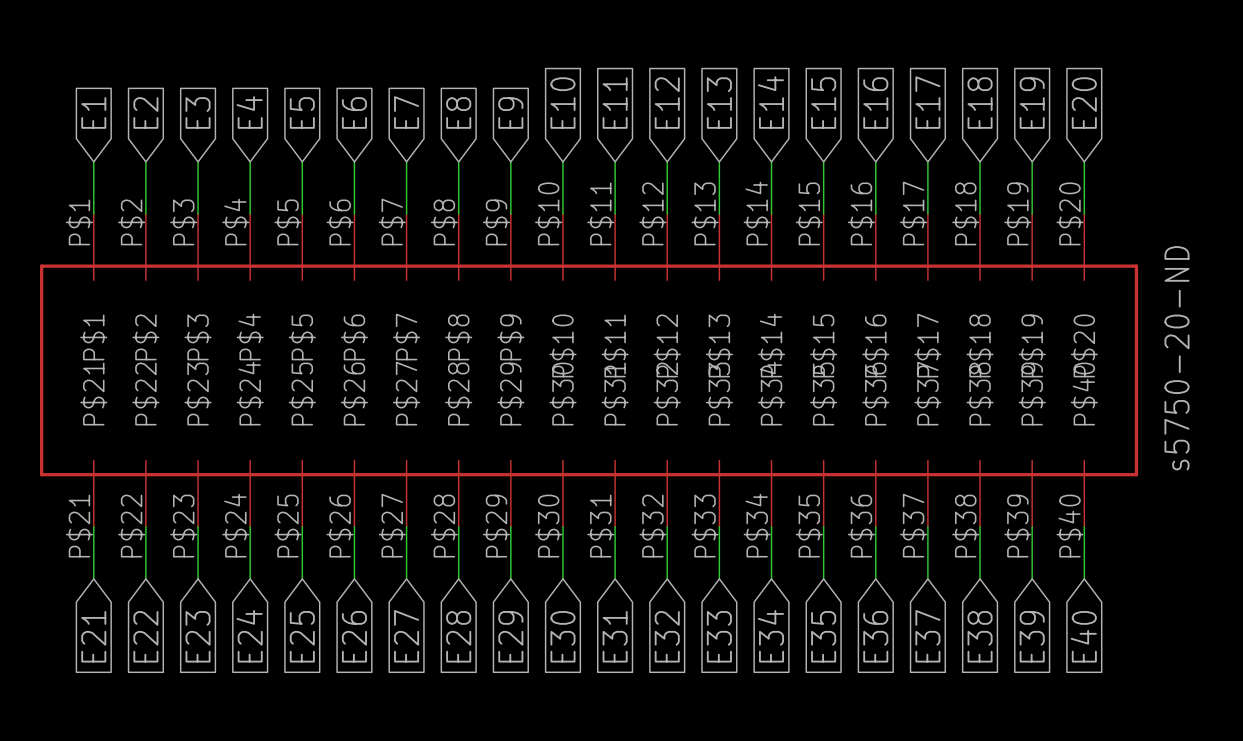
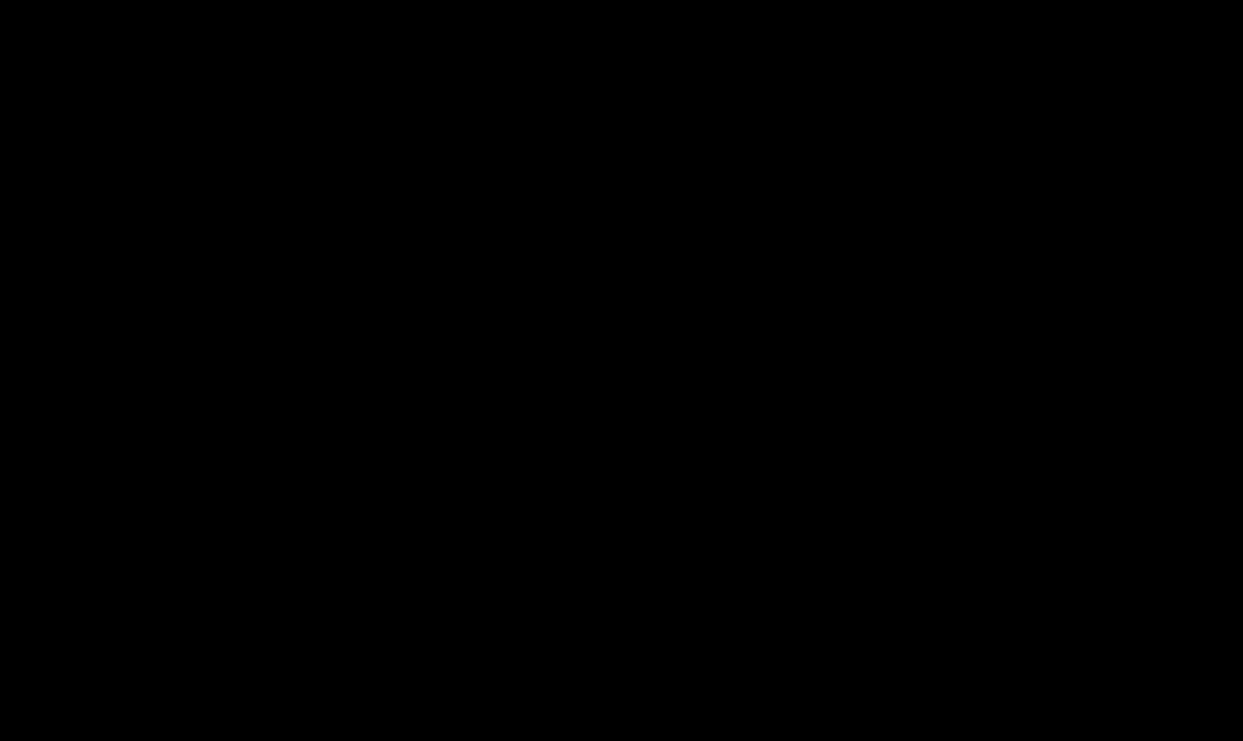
global label: E14 (770, 102) -> none
global label: E17 (927, 102) -> none
global label: E10 (562, 103) -> none
global label: E11 (615, 103) -> none
global label: E12 (667, 103) -> none
global label: E13 (719, 103) -> none
global label: E15 (823, 103) -> none
global label: E16 (875, 103) -> none
global label: E18 (980, 103) -> none
global label: E19 (1032, 103) -> none
global label: E20 (1084, 103) -> none
global label: E1 (93, 112) -> none
global label: E2 (145, 112) -> none
global label: E3 (198, 112) -> none
global label: E4 (249, 112) -> none
global label: E5 (302, 112) -> none
global label: E6 (354, 112) -> none
global label: E7 (406, 112) -> none
global label: E8 (458, 112) -> none
global label: E9 (510, 112) -> none
wire: (93, 161) (93, 214) -> none
wire: (145, 161) (145, 214) -> none
wire: (198, 161) (198, 214) -> none
wire: (250, 161) (250, 214) -> none
wire: (302, 161) (302, 214) -> none
wire: (354, 161) (354, 214) -> none
wire: (406, 161) (406, 214) -> none
wire: (458, 161) (458, 214) -> none
wire: (510, 161) (510, 214) -> none
wire: (562, 161) (562, 214) -> none
wire: (615, 161) (615, 214) -> none
wire: (667, 161) (667, 214) -> none
wire: (719, 161) (719, 214) -> none
wire: (771, 161) (771, 214) -> none
wire: (823, 161) (823, 214) -> none
wire: (875, 161) (875, 214) -> none
wire: (927, 161) (927, 214) -> none
wire: (980, 161) (980, 214) -> none
wire: (1032, 161) (1032, 214) -> none
wire: (1084, 161) (1084, 214) -> none
part: (589, 370) -> none
wire: (93, 526) (93, 578) -> none
wire: (145, 526) (145, 578) -> none
wire: (198, 526) (198, 578) -> none
wire: (250, 526) (250, 578) -> none
wire: (302, 526) (302, 578) -> none
wire: (354, 526) (354, 578) -> none
wire: (406, 526) (406, 578) -> none
wire: (458, 526) (458, 578) -> none
wire: (510, 526) (510, 578) -> none
wire: (562, 526) (562, 578) -> none
wire: (615, 526) (615, 578) -> none
wire: (667, 526) (667, 578) -> none
wire: (719, 526) (719, 578) -> none
wire: (771, 526) (771, 578) -> none
wire: (823, 526) (823, 578) -> none
wire: (875, 526) (875, 578) -> none
wire: (927, 526) (927, 578) -> none
wire: (980, 526) (980, 578) -> none
wire: (1032, 526) (1032, 578) -> none
wire: (1084, 526) (1084, 578) -> none
global label: E21 (93, 636) -> none
global label: E22 (145, 636) -> none
global label: E23 (198, 636) -> none
global label: E24 (249, 636) -> none
global label: E25 (302, 636) -> none
global label: E26 (354, 636) -> none
global label: E27 (406, 636) -> none
global label: E28 (458, 636) -> none
global label: E29 (510, 636) -> none
global label: E30 (562, 636) -> none
global label: E31 (615, 636) -> none
global label: E32 (667, 636) -> none
global label: E33 (719, 636) -> none
global label: E34 (770, 636) -> none
global label: E35 (823, 636) -> none
global label: E36 (875, 636) -> none
global label: E37 (927, 636) -> none
global label: E38 (980, 636) -> none
global label: E39 (1032, 636) -> none
global label: E40 (1083, 636) -> none

